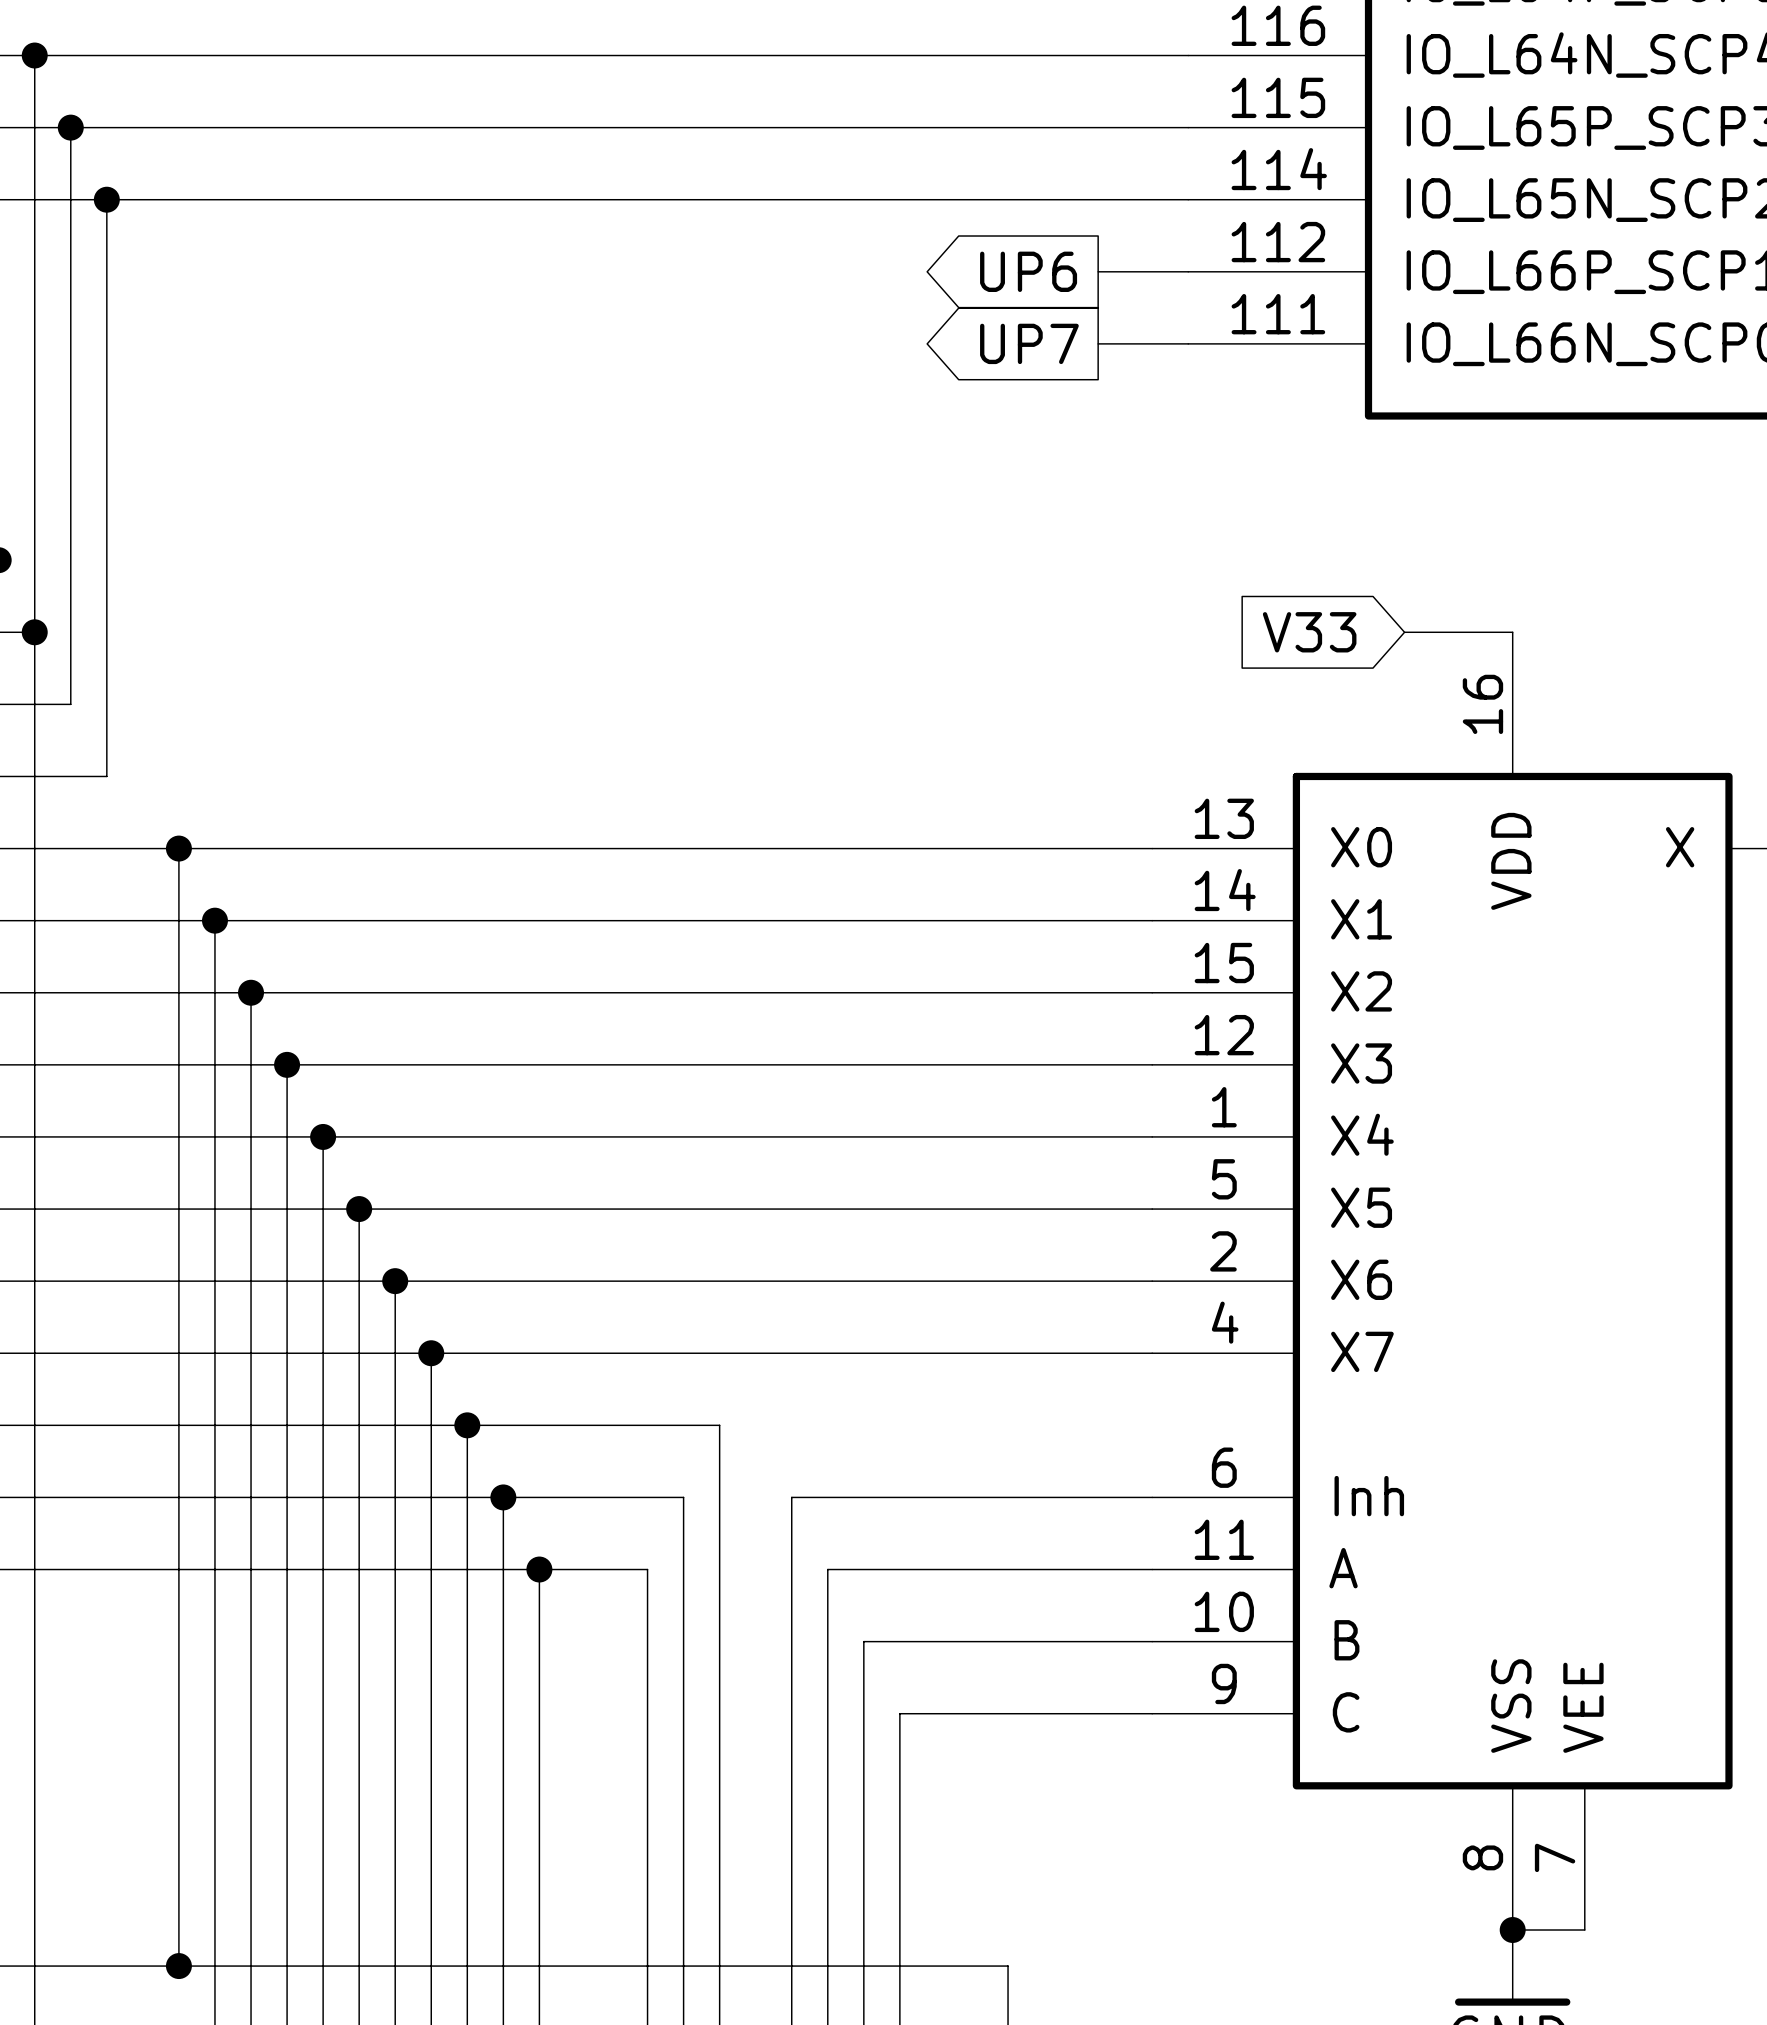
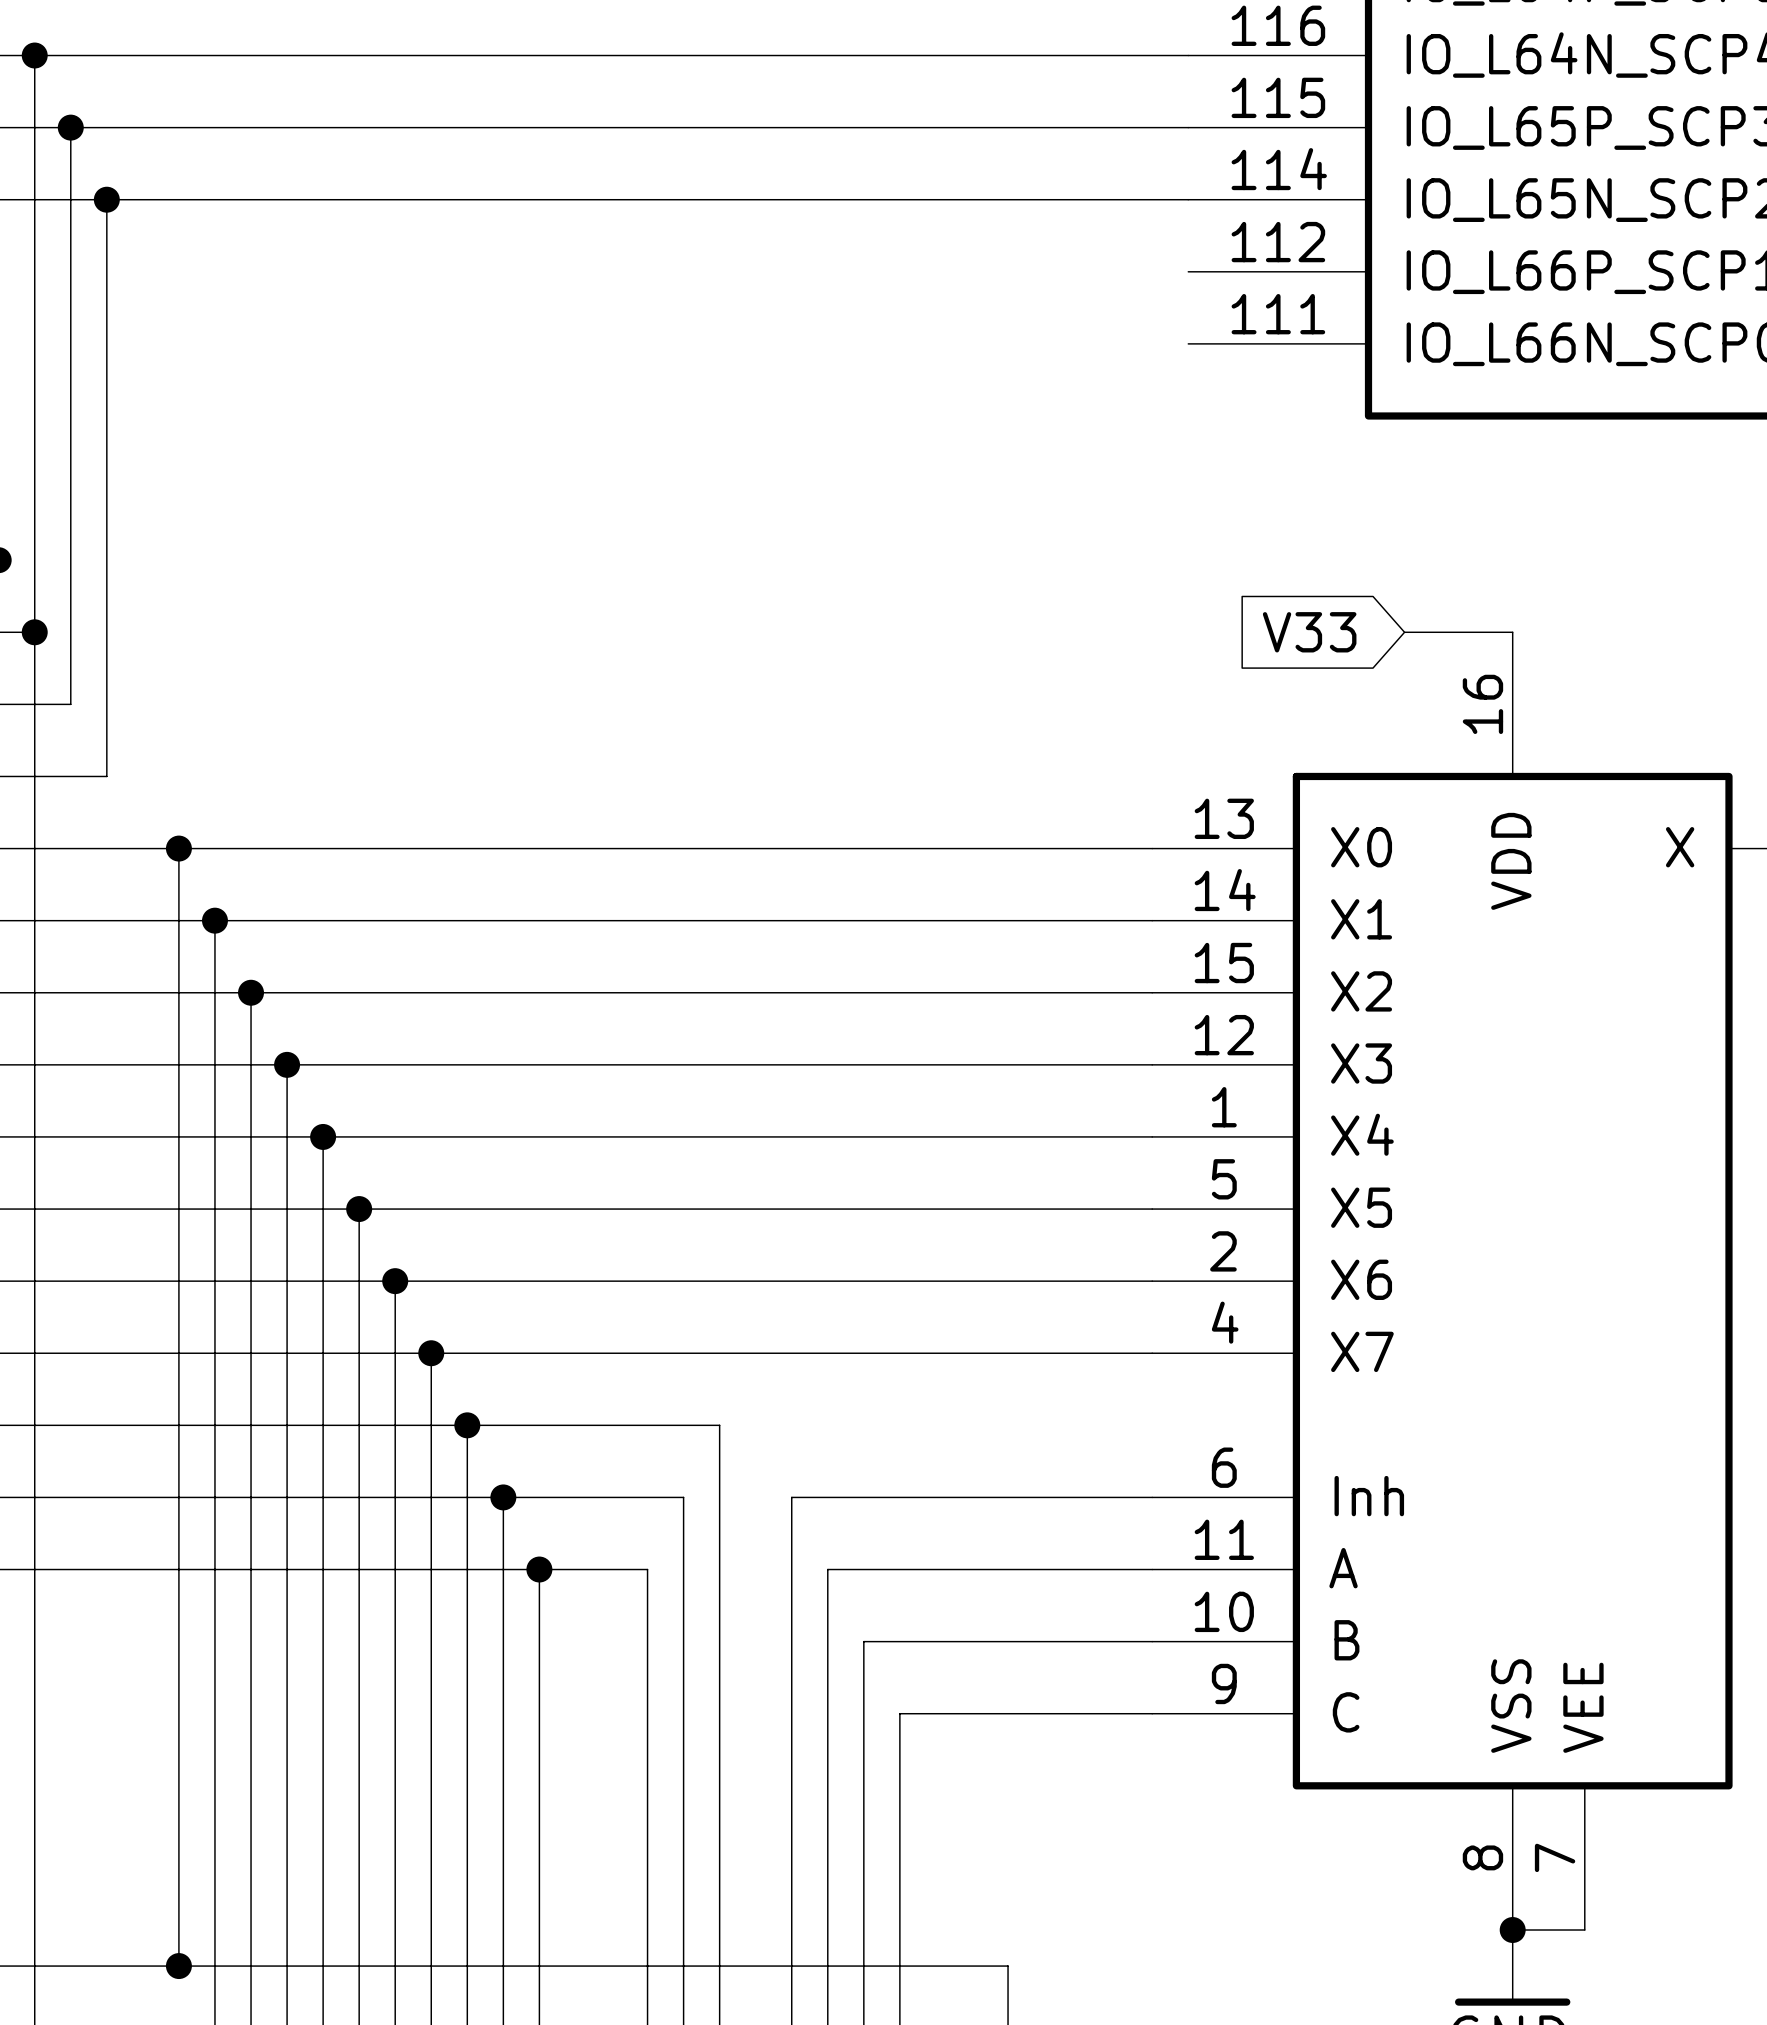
global label: UP6 (1028, 271) -> none
wire: (1098, 271) (1188, 271) -> none
global label: UP7 (1029, 343) -> none
wire: (1098, 343) (1188, 343) -> none

